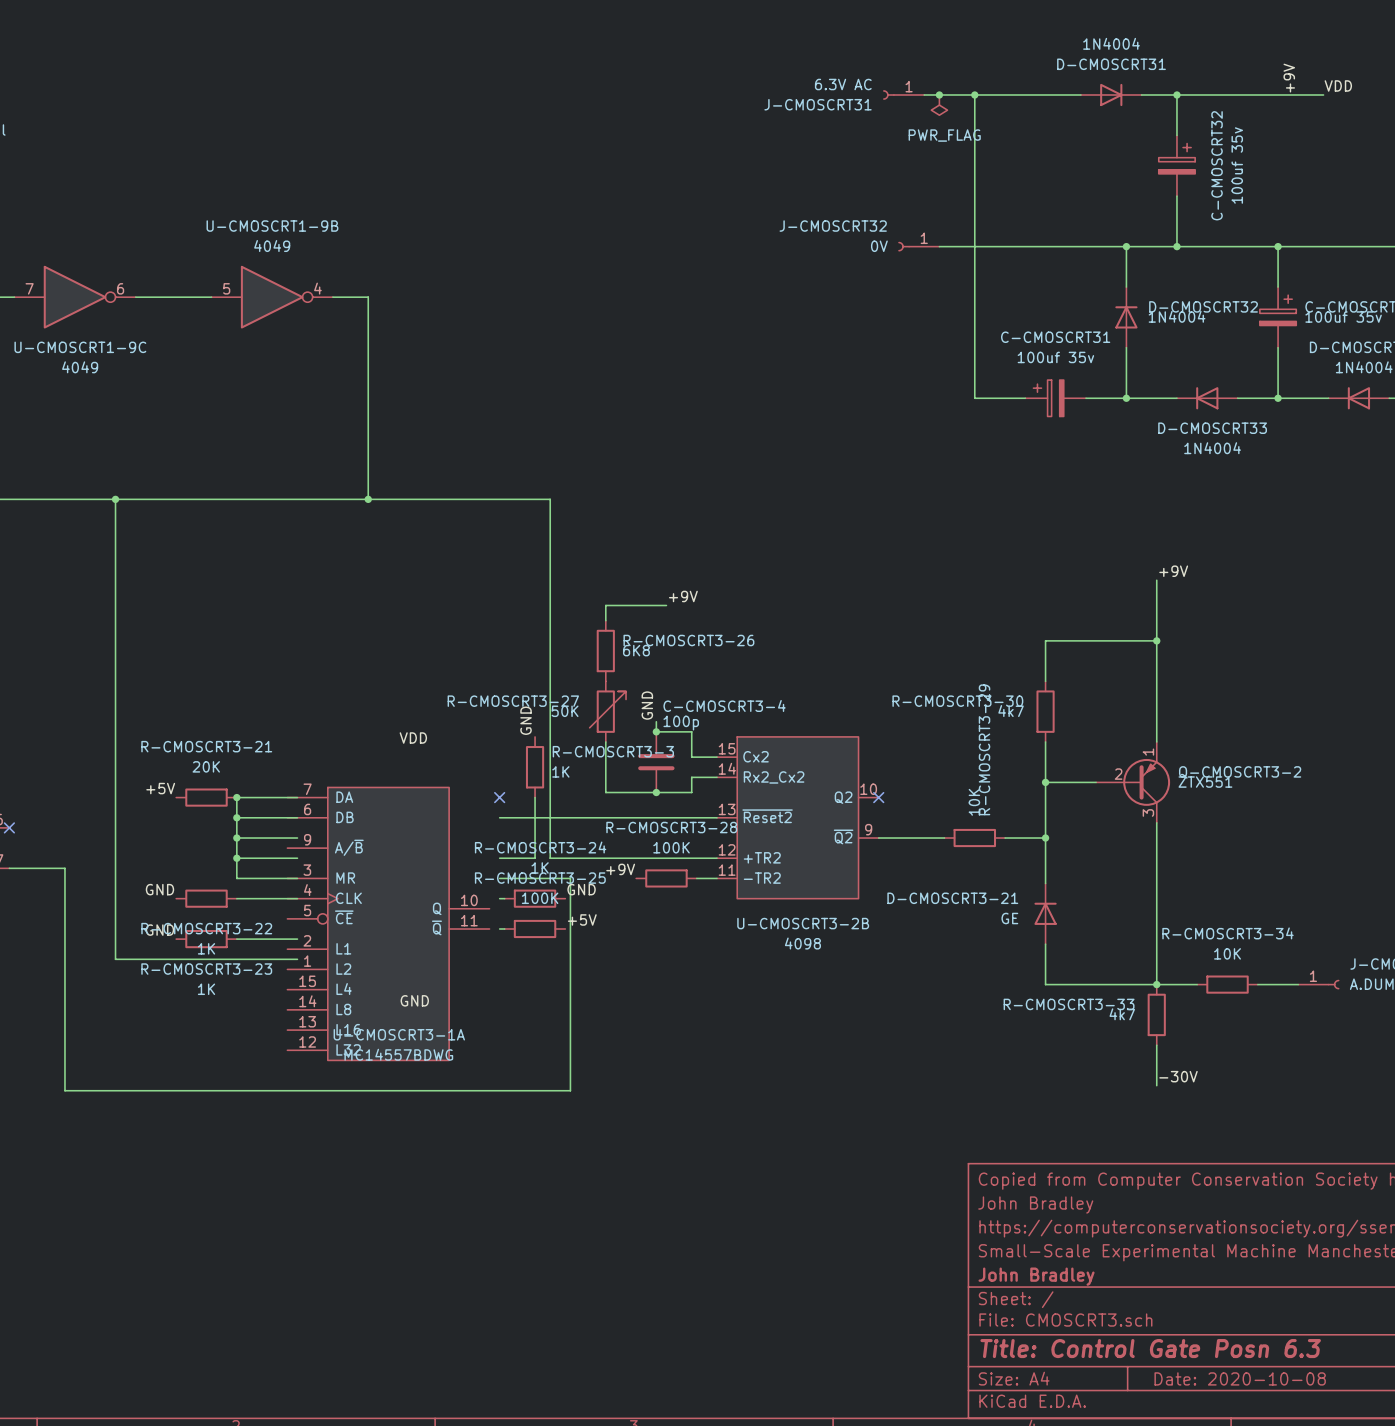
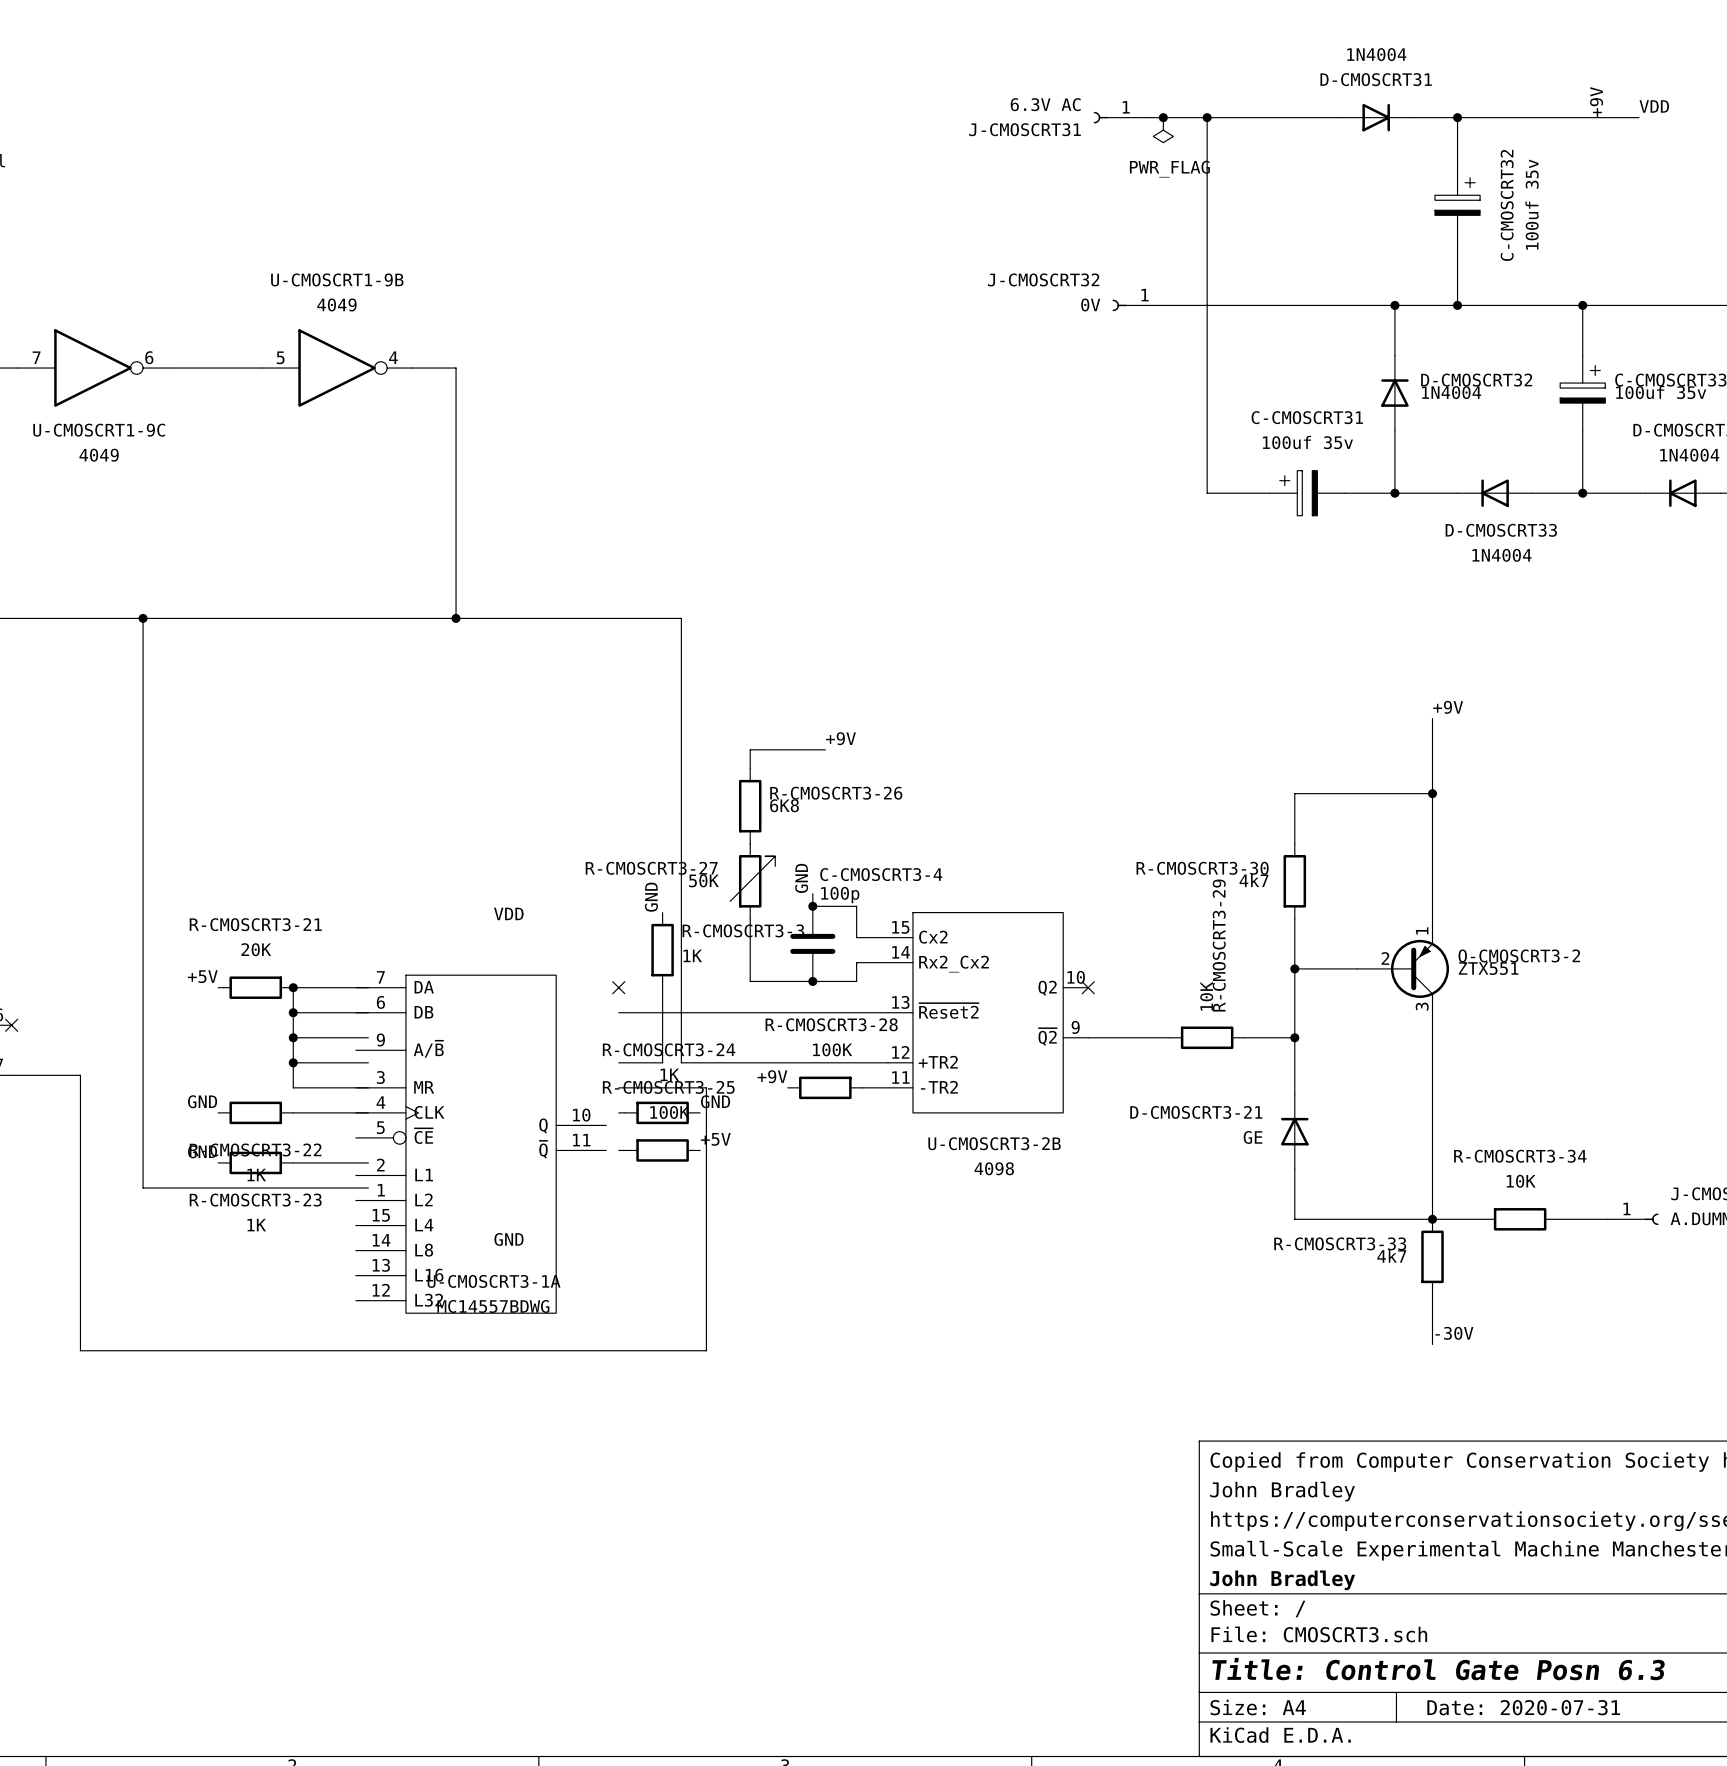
title block: Date: 2020-10-08 (1240, 1378) -> Date: 2020-07-31 (1523, 1707)

